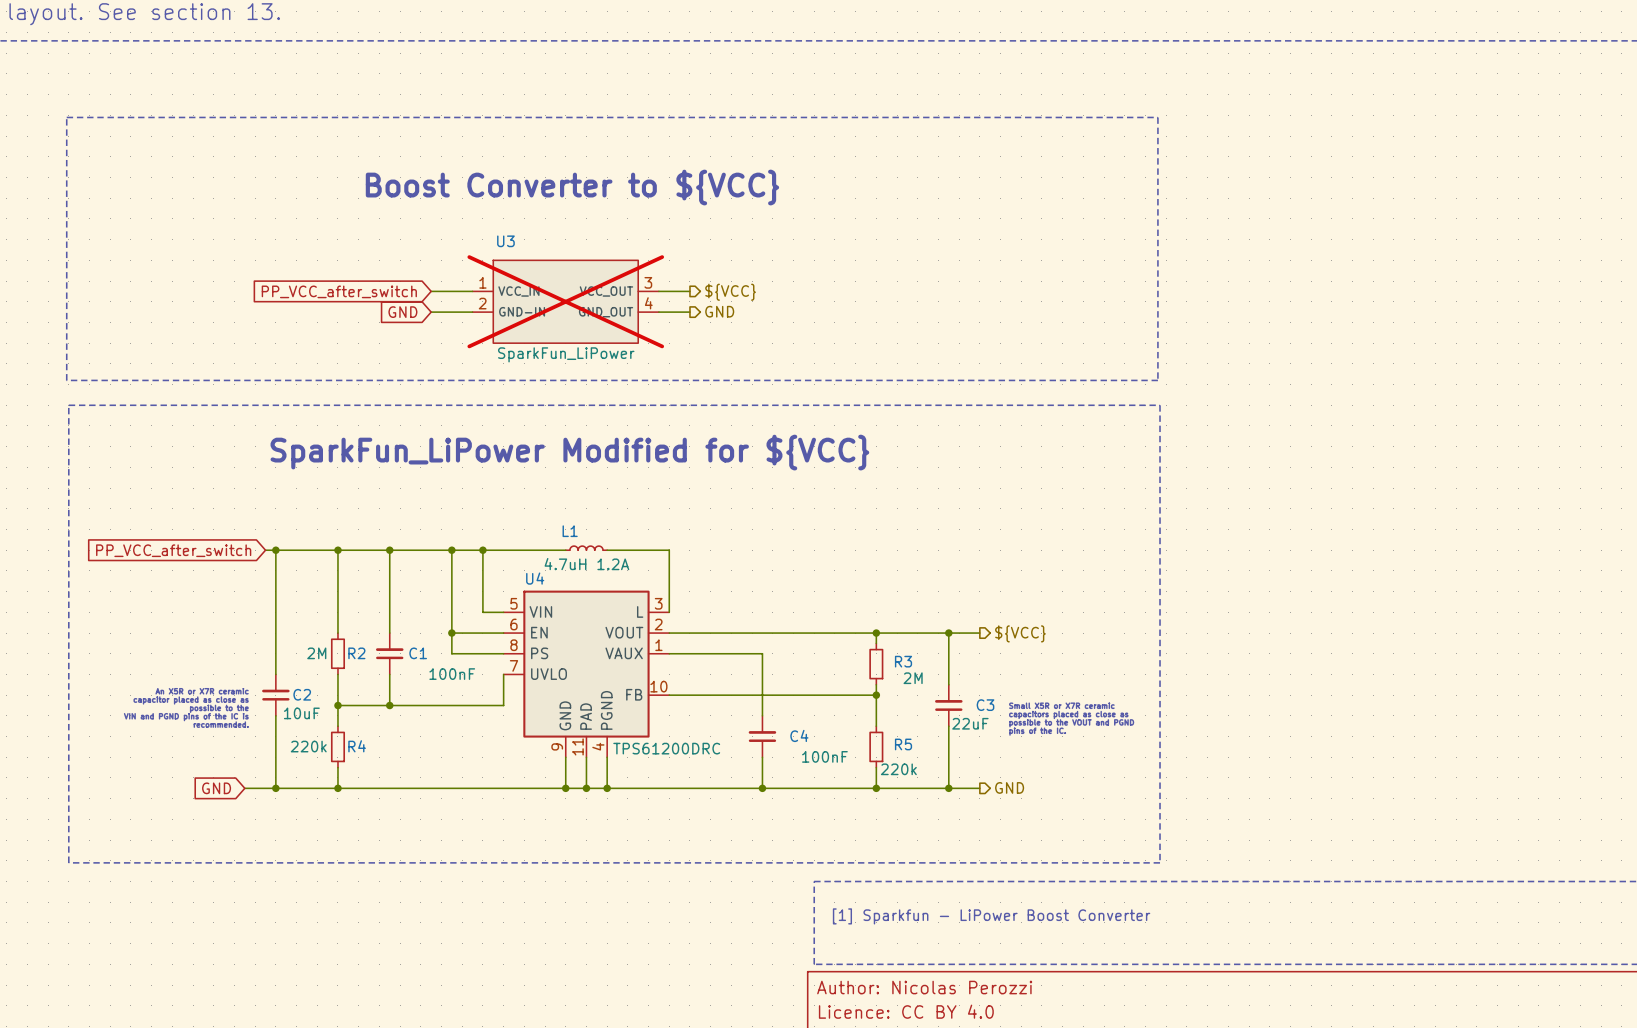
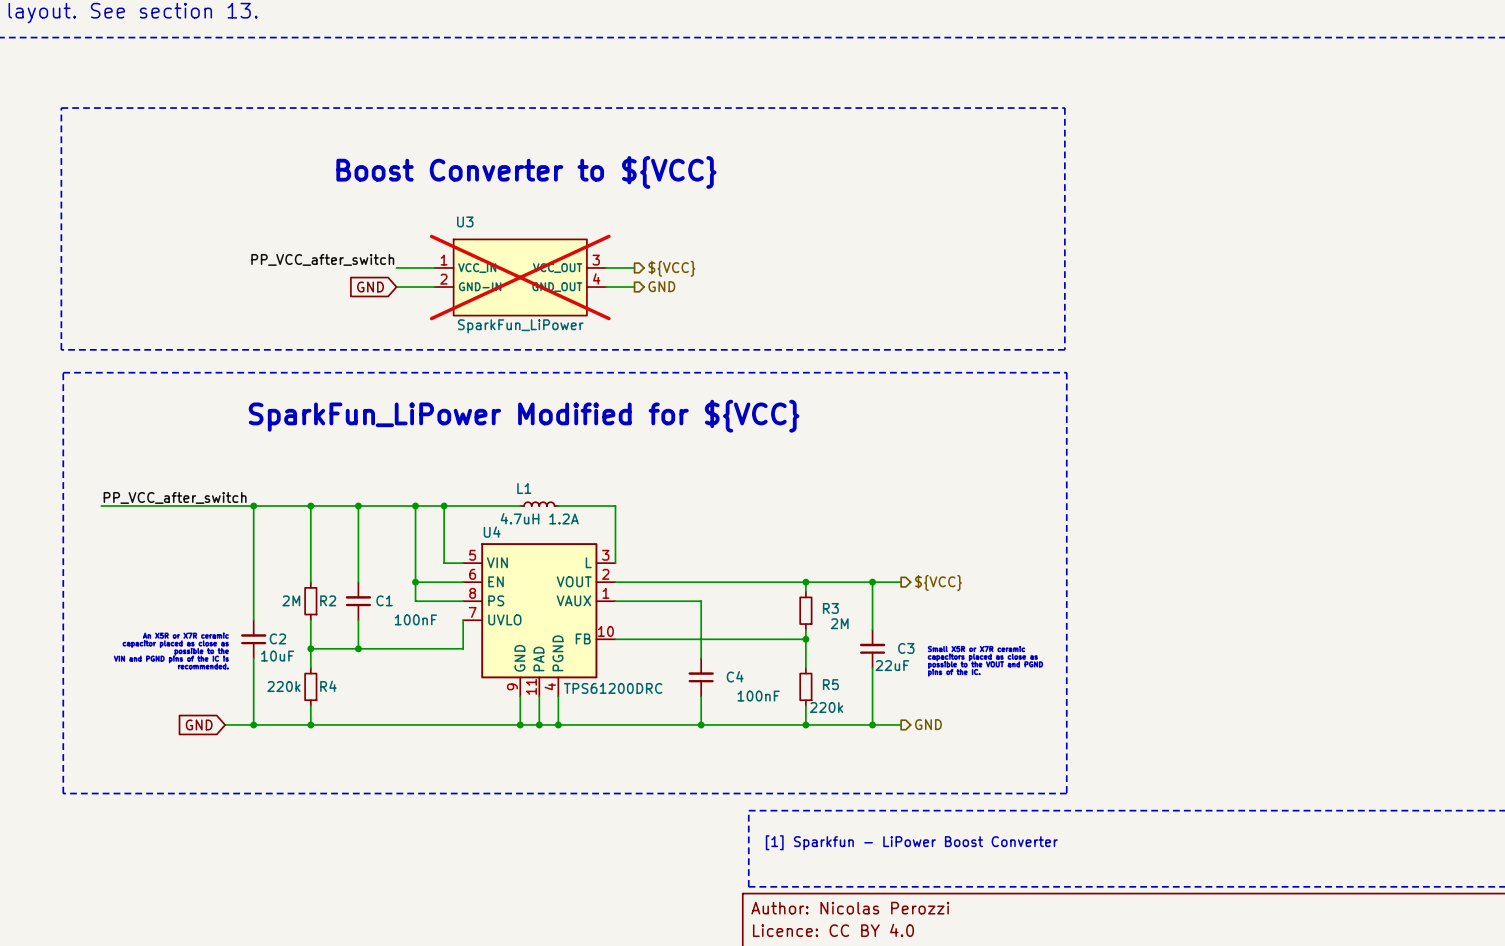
label: none -> PP_VCC_after_switch (322, 259)
global label: PP_VCC_after_switch (339, 291) -> none
label: none -> PP_VCC_after_switch (175, 497)
wire: none -> (101, 506) (244, 506)
global label: PP_VCC_after_switch (173, 550) -> none

